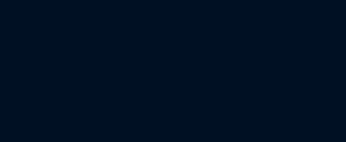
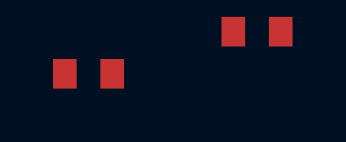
part: none -> (257, 31)
part: none -> (88, 73)

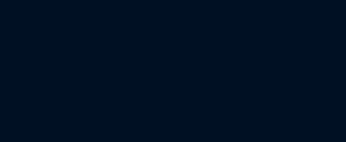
part: (257, 31) -> none
part: (88, 73) -> none

